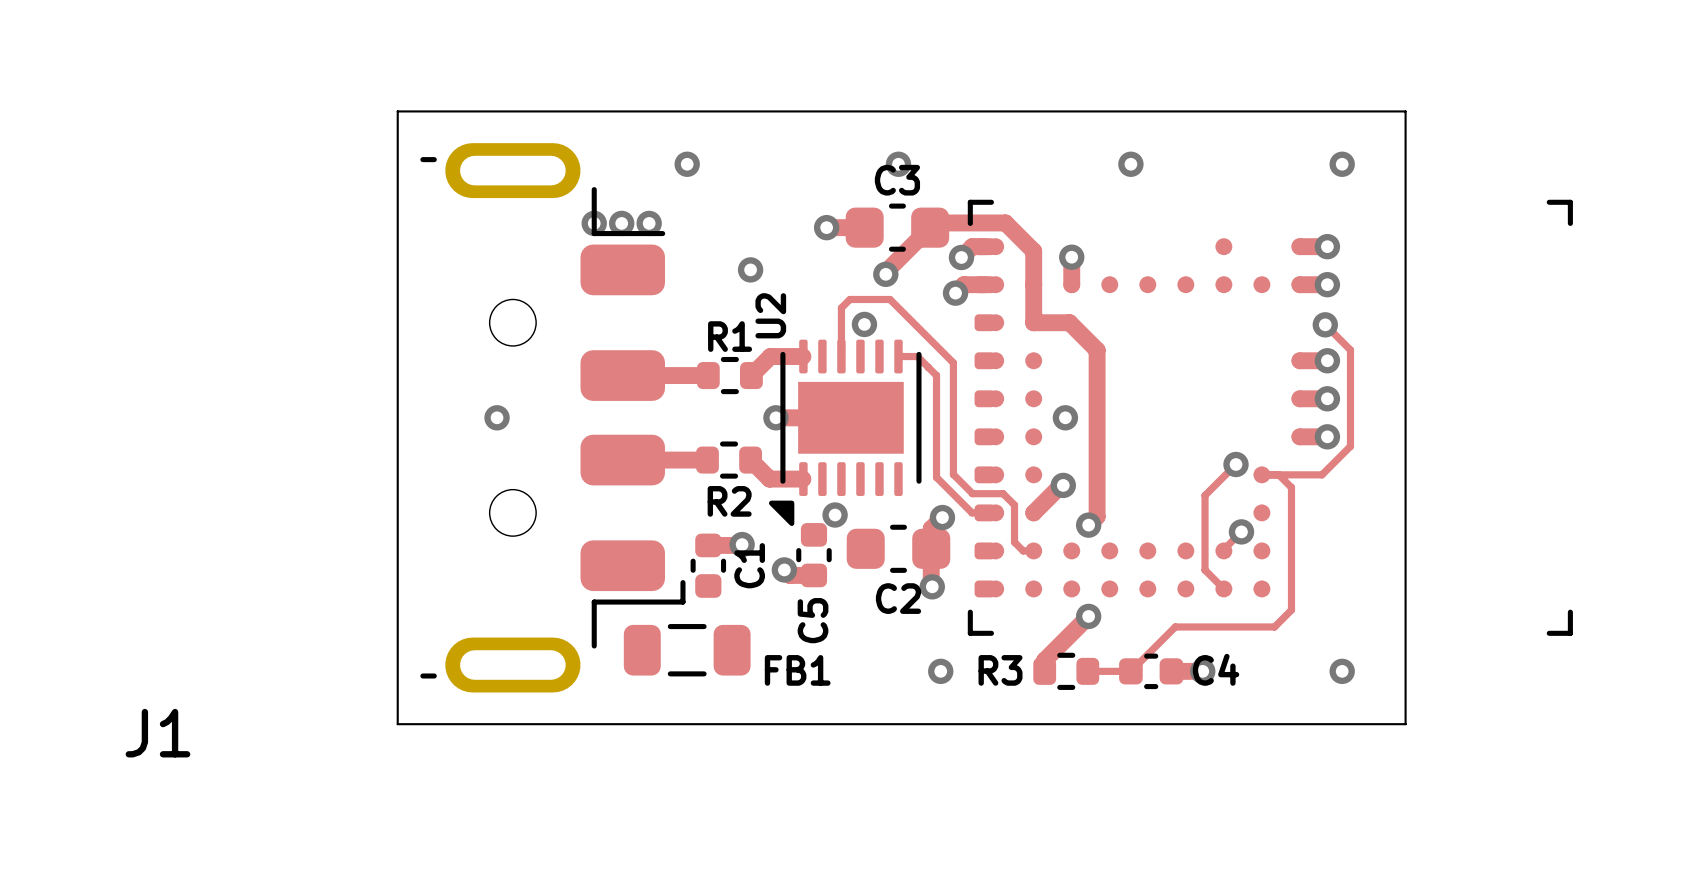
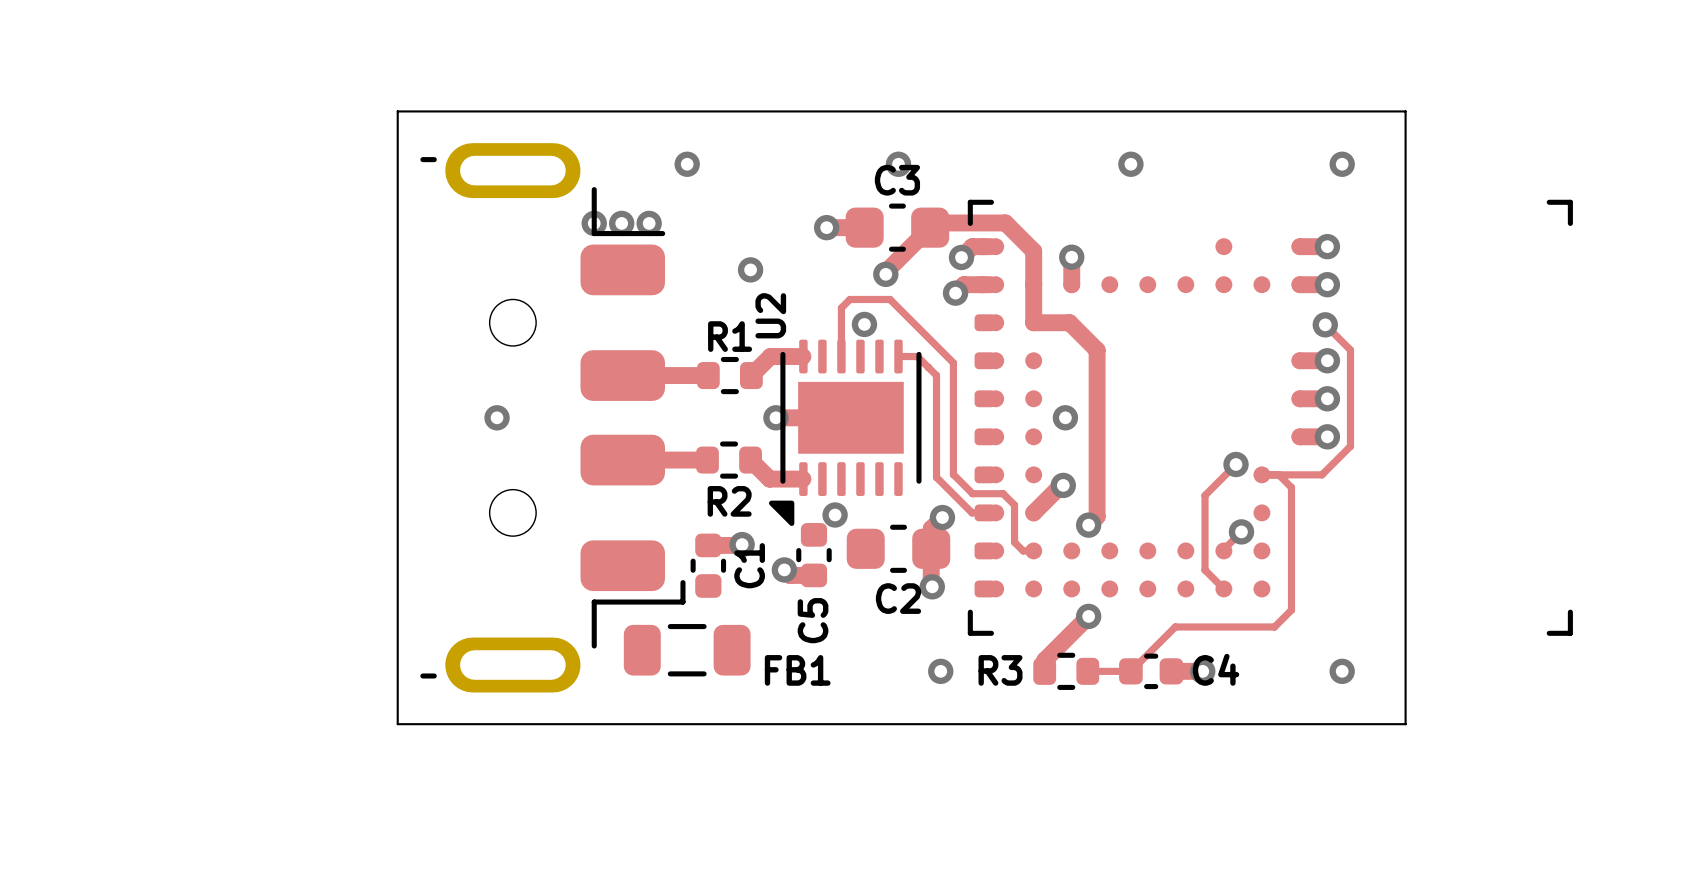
J1 name: J1 (157, 733) -> none

